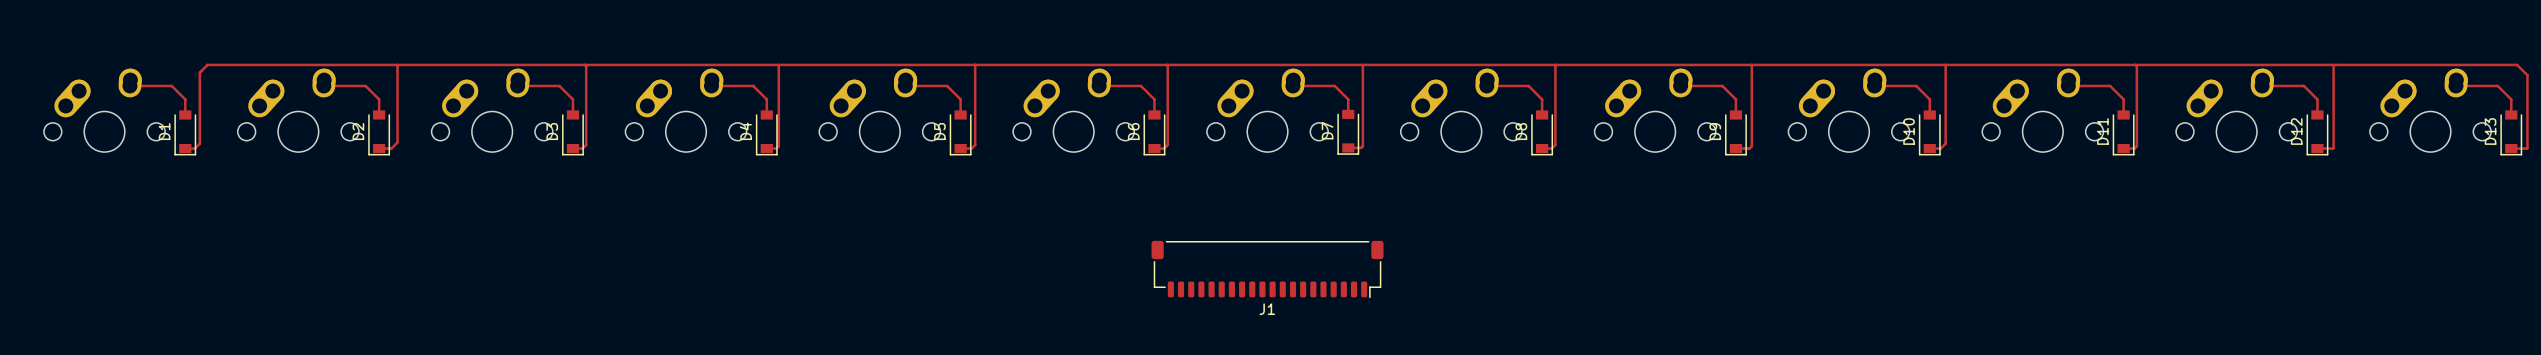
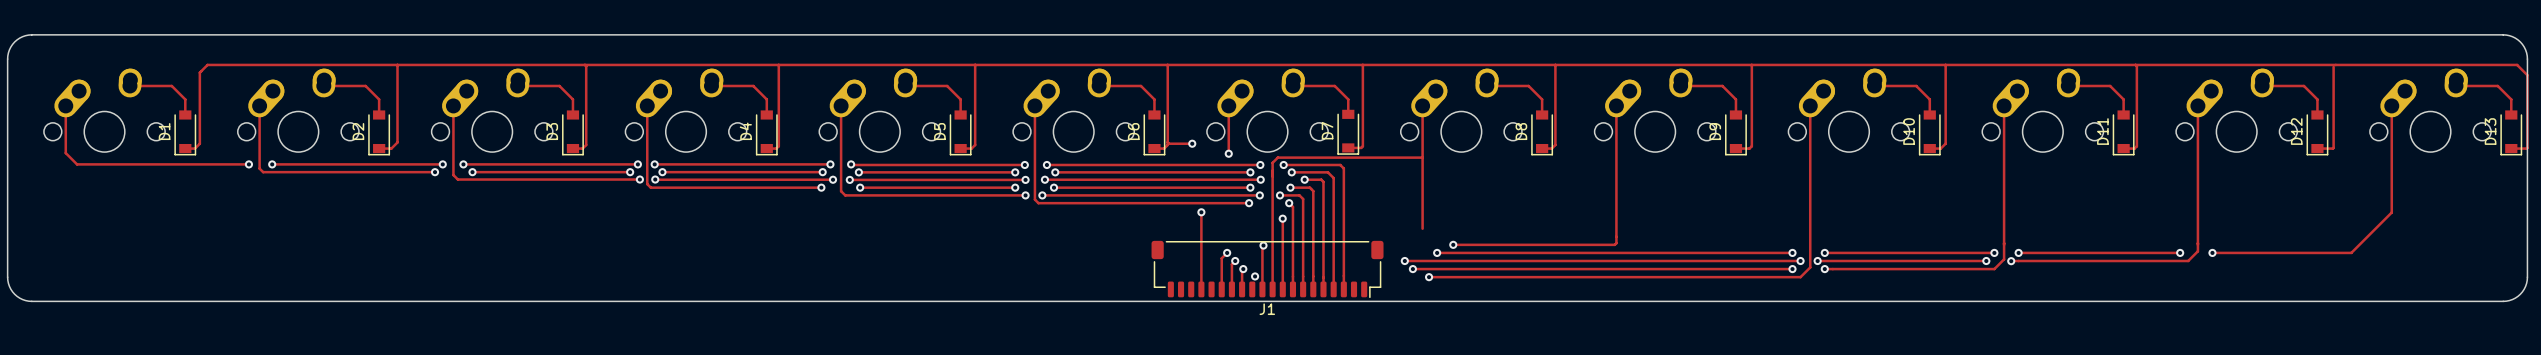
board edge: none -> (31, 34) (2506, 35) (2520, 41) (2527, 55) (2527, 280) (2520, 294) (2512, 299) (2503, 301) (28, 301) (14, 294) (7, 280) (7, 59) (9, 49) (14, 41) (22, 36) (31, 34)
track: none -> (65, 105) (65, 153) (77, 164) (248, 164)
track: none -> (259, 105) (259, 168) (263, 172) (435, 172)
track: none -> (453, 105) (453, 175) (457, 179) (639, 179)
track: none -> (647, 105) (647, 184) (650, 187) (821, 187)
track: none -> (841, 105) (841, 191) (845, 195) (1025, 195)
track: none -> (1034, 105) (1034, 199) (1038, 203) (1249, 203)
track: none -> (1228, 105) (1228, 153)
track: none -> (1422, 105) (1422, 228)
track: none -> (1616, 105) (1616, 243) (1614, 244) (1453, 244)
track: none -> (1810, 105) (1810, 267) (1800, 277) (1429, 277)
track: none -> (2004, 105) (2004, 259) (1994, 269) (1824, 269)
track: none -> (2197, 105) (2197, 251) (2188, 261) (2011, 261)
track: none -> (2391, 105) (2391, 212) (2351, 252) (2212, 252)
track: none -> (1167, 142) (1192, 143)
via: none -> (1192, 143)
via: none -> (1228, 153)
track: none -> (1422, 157) (1277, 157) (1272, 162) (1272, 289)
via: none -> (248, 164)
track: none -> (272, 164) (442, 164)
via: none -> (272, 164)
via: none -> (442, 164)
track: none -> (463, 164) (637, 164)
via: none -> (463, 164)
via: none -> (637, 164)
track: none -> (654, 164) (830, 164)
via: none -> (654, 164)
via: none -> (830, 164)
track: none -> (851, 164) (1024, 164)
via: none -> (851, 164)
via: none -> (1024, 164)
track: none -> (1044, 164) (1260, 164)
via: none -> (1046, 164)
via: none -> (1260, 164)
track: none -> (1283, 164) (1340, 164) (1343, 168) (1343, 289)
via: none -> (1283, 164)
via: none -> (435, 172)
track: none -> (472, 172) (630, 172)
via: none -> (472, 172)
via: none -> (630, 172)
track: none -> (662, 172) (822, 172)
via: none -> (662, 172)
via: none -> (822, 172)
track: none -> (858, 172) (1015, 172)
via: none -> (858, 172)
via: none -> (1015, 172)
track: none -> (1055, 172) (1250, 172)
via: none -> (1055, 172)
via: none -> (1250, 172)
track: none -> (1291, 172) (1327, 172) (1333, 178) (1333, 289)
via: none -> (1291, 172)
via: none -> (639, 179)
track: none -> (655, 179) (833, 179)
via: none -> (655, 179)
via: none -> (833, 179)
track: none -> (849, 179) (1025, 179)
via: none -> (849, 179)
via: none -> (1025, 179)
track: none -> (1044, 179) (1260, 179)
via: none -> (1044, 179)
via: none -> (1260, 179)
track: none -> (1304, 179) (1321, 179) (1323, 181) (1323, 289)
via: none -> (1304, 179)
via: none -> (821, 187)
track: none -> (860, 187) (1015, 187)
via: none -> (860, 187)
via: none -> (1015, 187)
track: none -> (1053, 187) (1250, 187)
via: none -> (1053, 187)
via: none -> (1250, 187)
track: none -> (1290, 187) (1309, 187) (1313, 191) (1313, 289)
via: none -> (1290, 187)
via: none -> (1025, 195)
track: none -> (1042, 195) (1259, 195)
via: none -> (1042, 195)
via: none -> (1259, 195)
track: none -> (1279, 195) (1299, 195) (1303, 199) (1303, 289)
via: none -> (1279, 195)
via: none -> (1249, 203)
track: none -> (1289, 203) (1292, 206) (1292, 289)
via: none -> (1289, 203)
track: none -> (1201, 212) (1201, 289)
via: none -> (1201, 212)
track: none -> (1282, 218) (1282, 289)
via: none -> (1282, 218)
via: none -> (1453, 244)
track: none -> (1263, 245) (1262, 289)
via: none -> (1263, 245)
track: none -> (1227, 252) (1221, 258) (1221, 289)
via: none -> (1227, 252)
track: none -> (1437, 252) (1792, 252)
via: none -> (1437, 252)
via: none -> (1792, 252)
track: none -> (1824, 252) (1994, 252)
via: none -> (1824, 252)
via: none -> (1994, 252)
track: none -> (2018, 252) (2180, 252)
via: none -> (2018, 252)
via: none -> (2180, 252)
via: none -> (2212, 252)
track: none -> (1235, 261) (1231, 264) (1231, 289)
via: none -> (1235, 261)
track: none -> (1404, 261) (1800, 261)
via: none -> (1404, 261)
via: none -> (1800, 261)
track: none -> (1817, 261) (1986, 261)
via: none -> (1817, 261)
via: none -> (1986, 261)
via: none -> (2011, 261)
track: none -> (1243, 269) (1242, 289)
via: none -> (1243, 269)
track: none -> (1412, 269) (1792, 269)
via: none -> (1412, 269)
via: none -> (1792, 269)
via: none -> (1824, 269)
via: none -> (1255, 276)
via: none -> (1429, 277)

